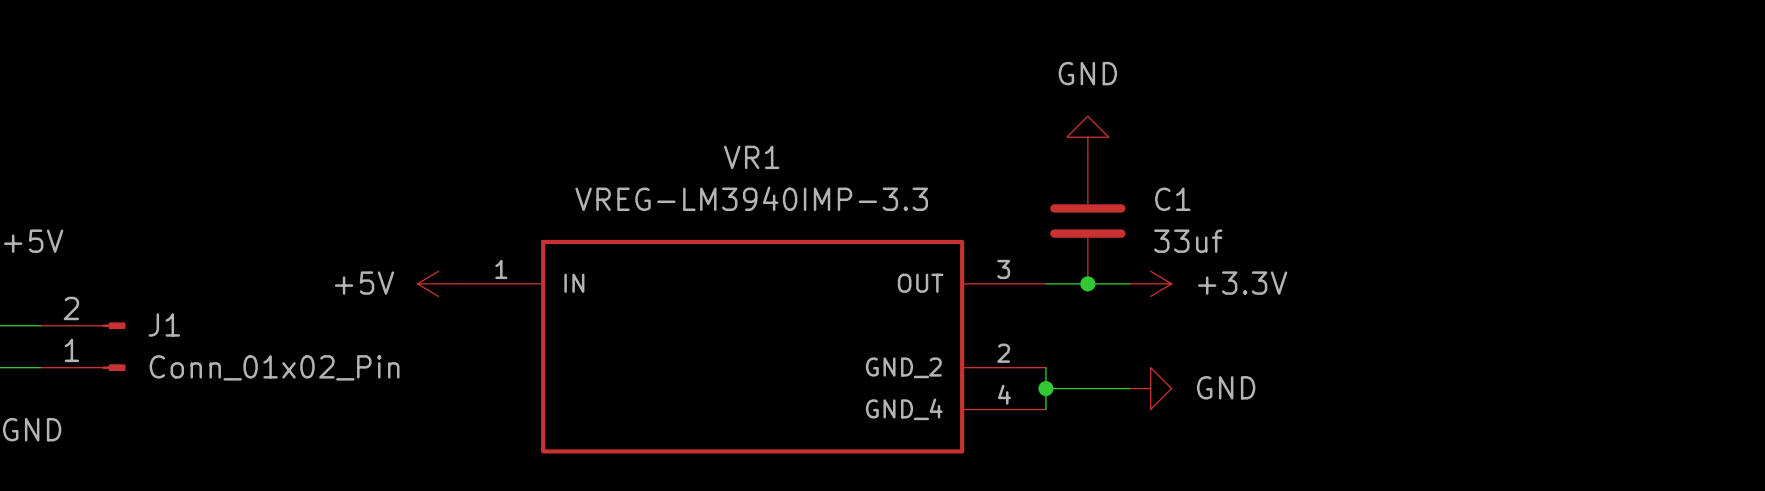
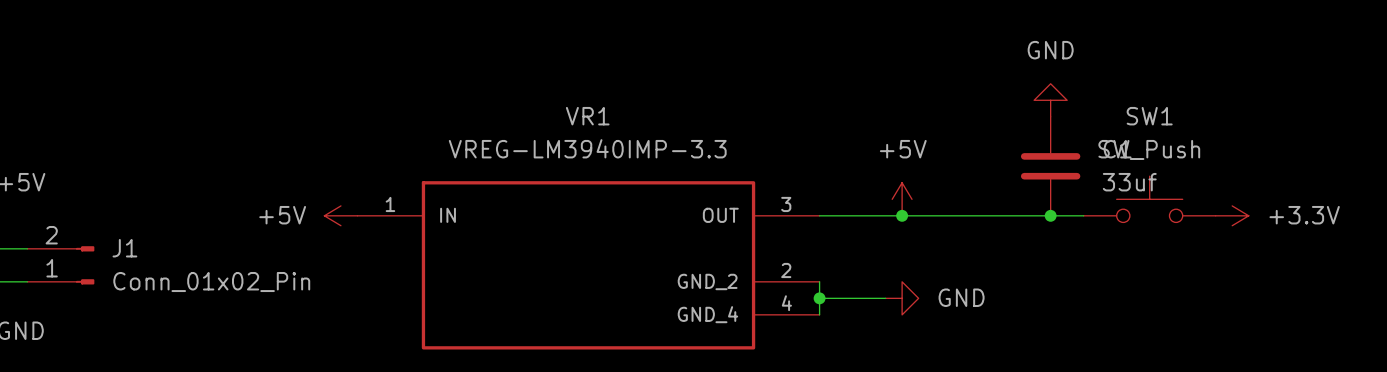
power symbol position: GND (1087, 137) -> GND (1050, 100)
C1 position: (1087, 221) -> (1050, 166)
power symbol: none -> +5V (902, 199)
SW1: none -> SW_Push (1149, 199)
junction position: (1087, 283) -> (902, 215)
wire: none -> (885, 215) (1083, 215)
power symbol: +3.3V (1150, 283) -> none
junction: none -> (1050, 215)
power symbol: none -> +3.3V (1232, 215)

